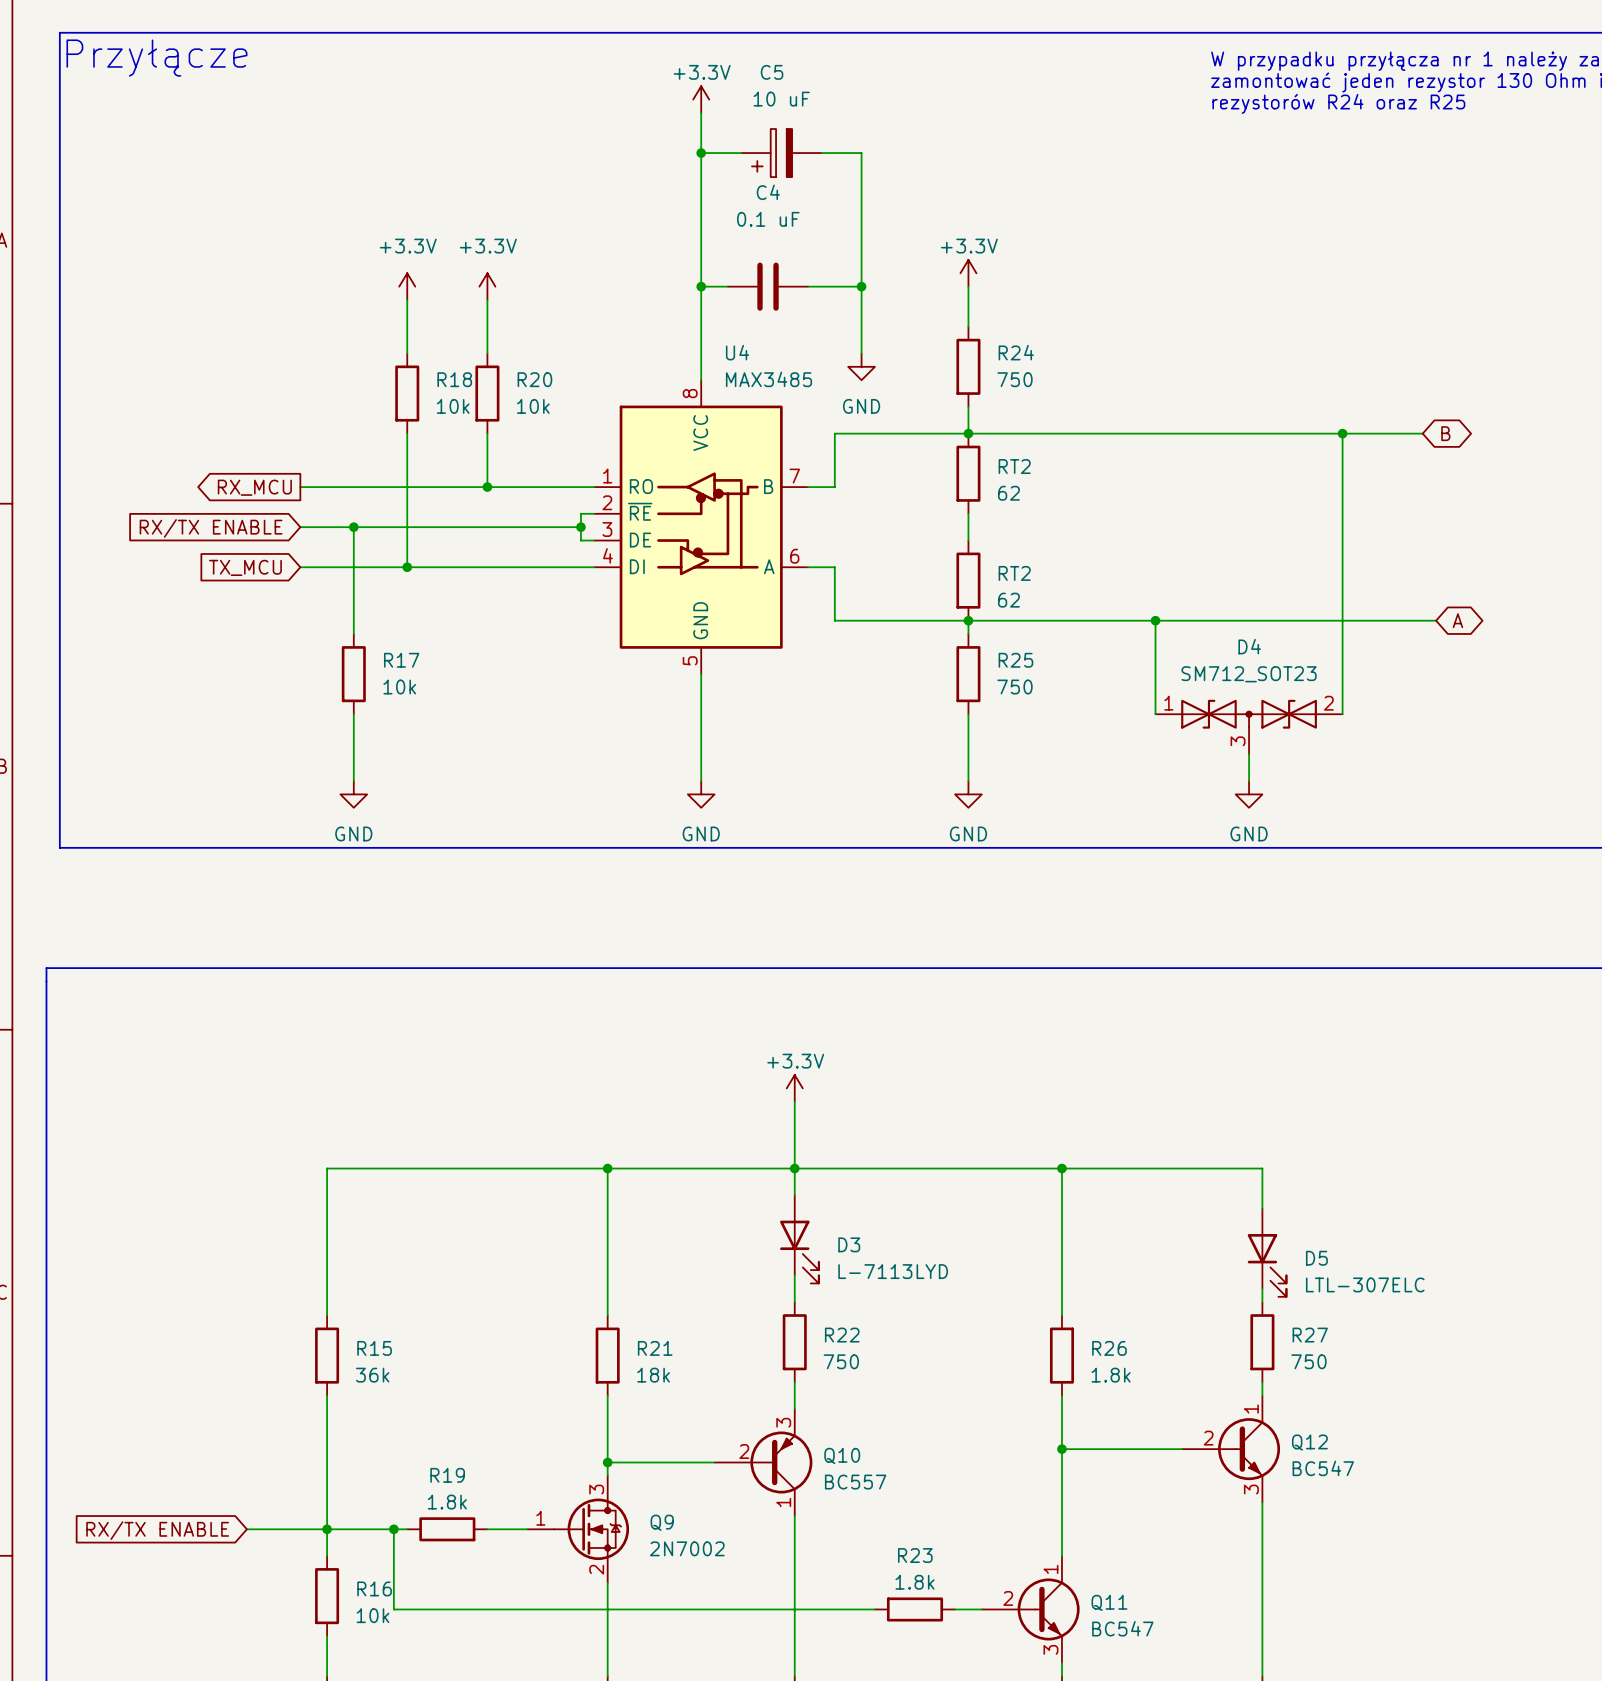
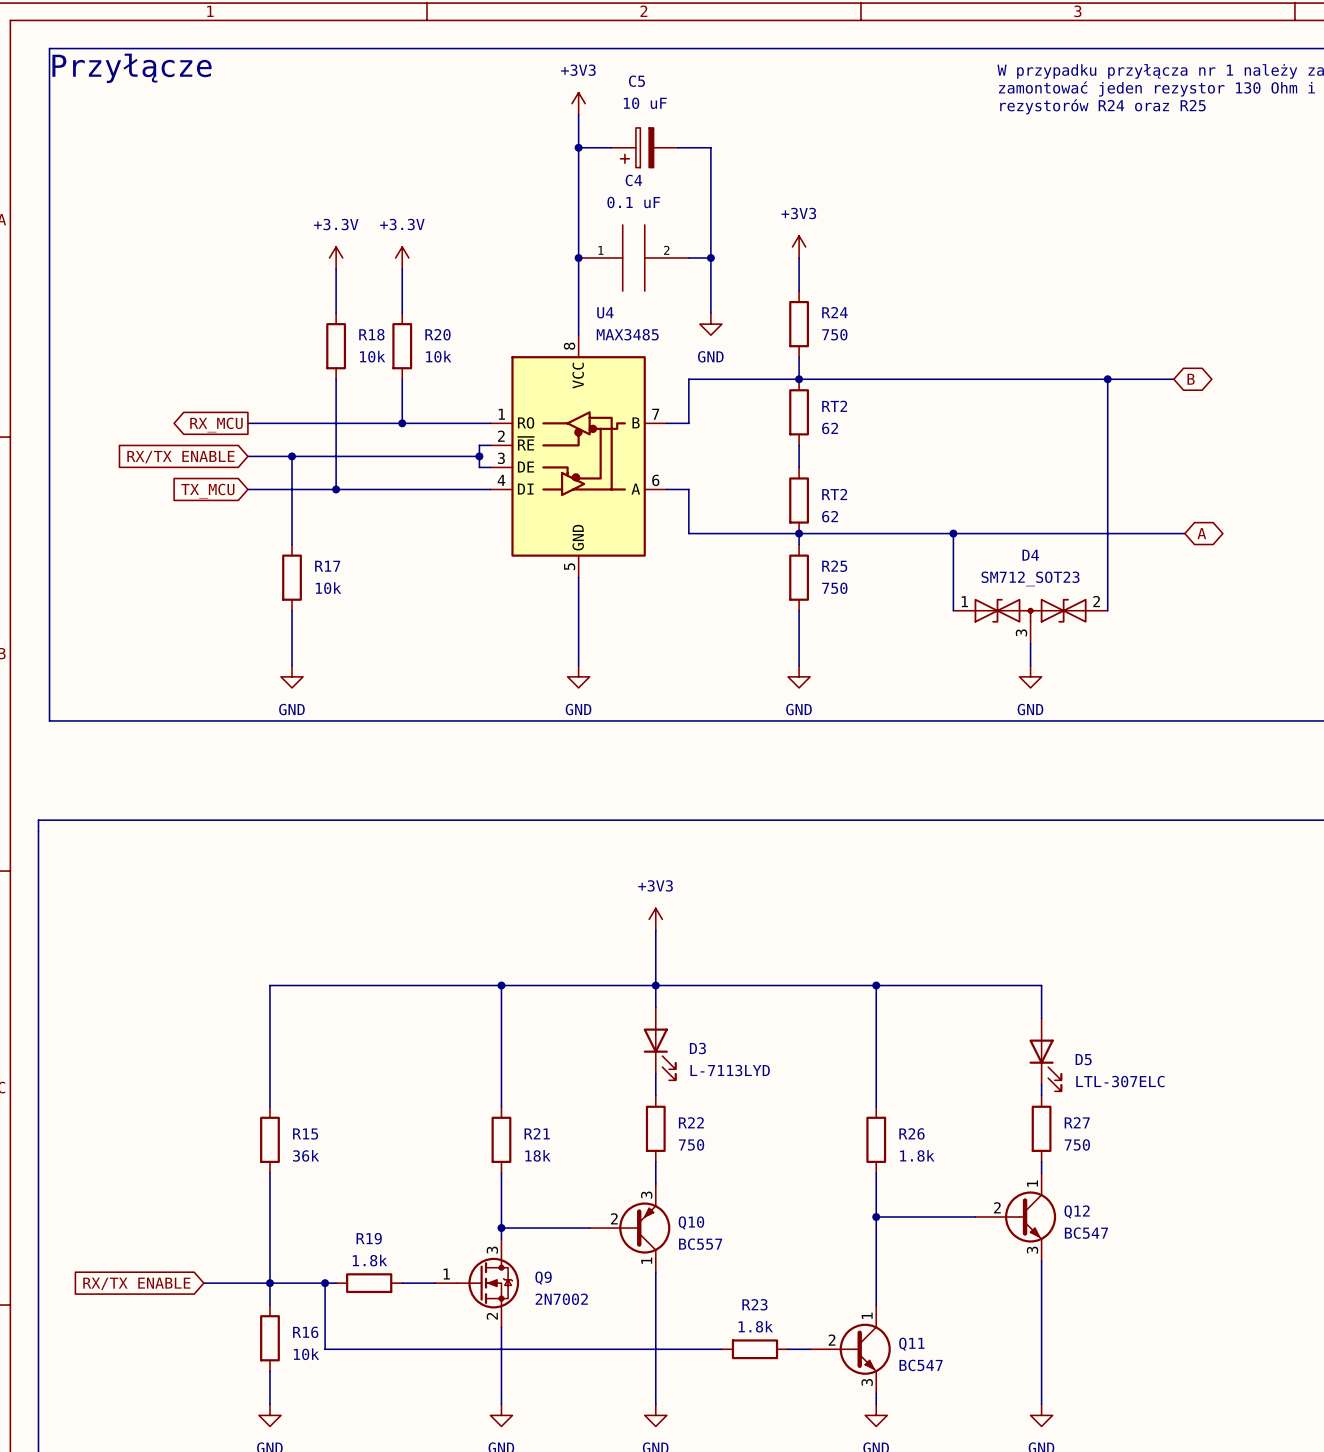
power symbol: +3.3V (701, 99) -> +3V3 (578, 103)
C4 symbol: [727, 262, 809, 311] -> [578, 224, 689, 292]
power symbol: +3.3V (968, 273) -> +3V3 (799, 246)
power symbol: +3.3V (794, 1088) -> +3V3 (655, 919)

